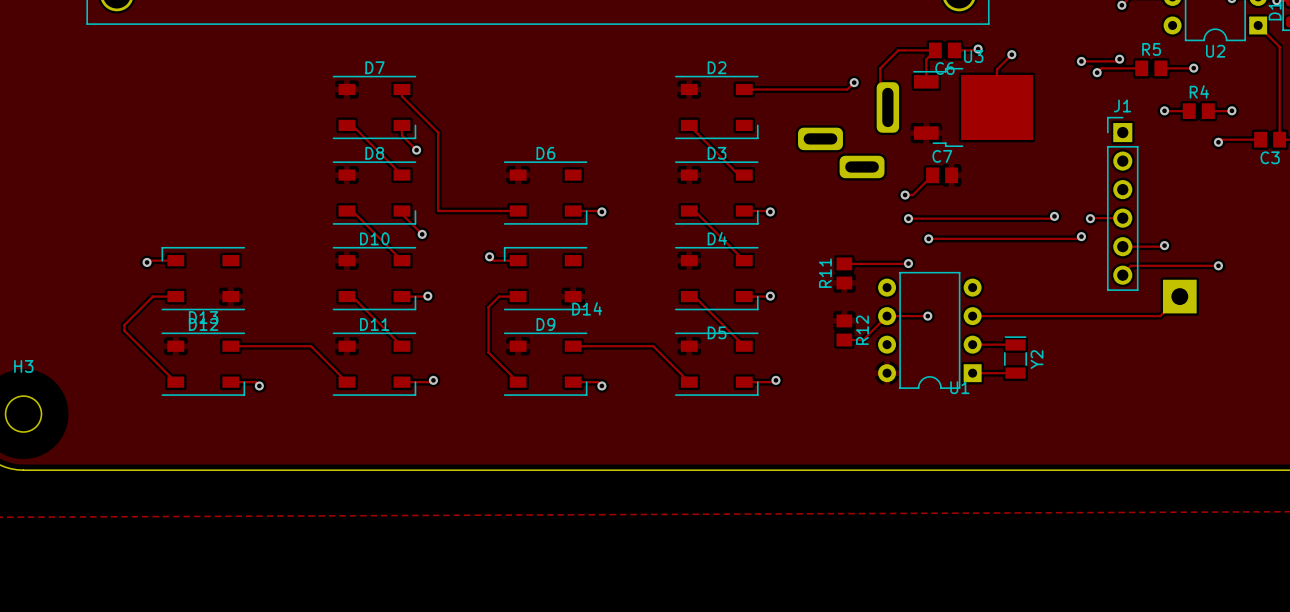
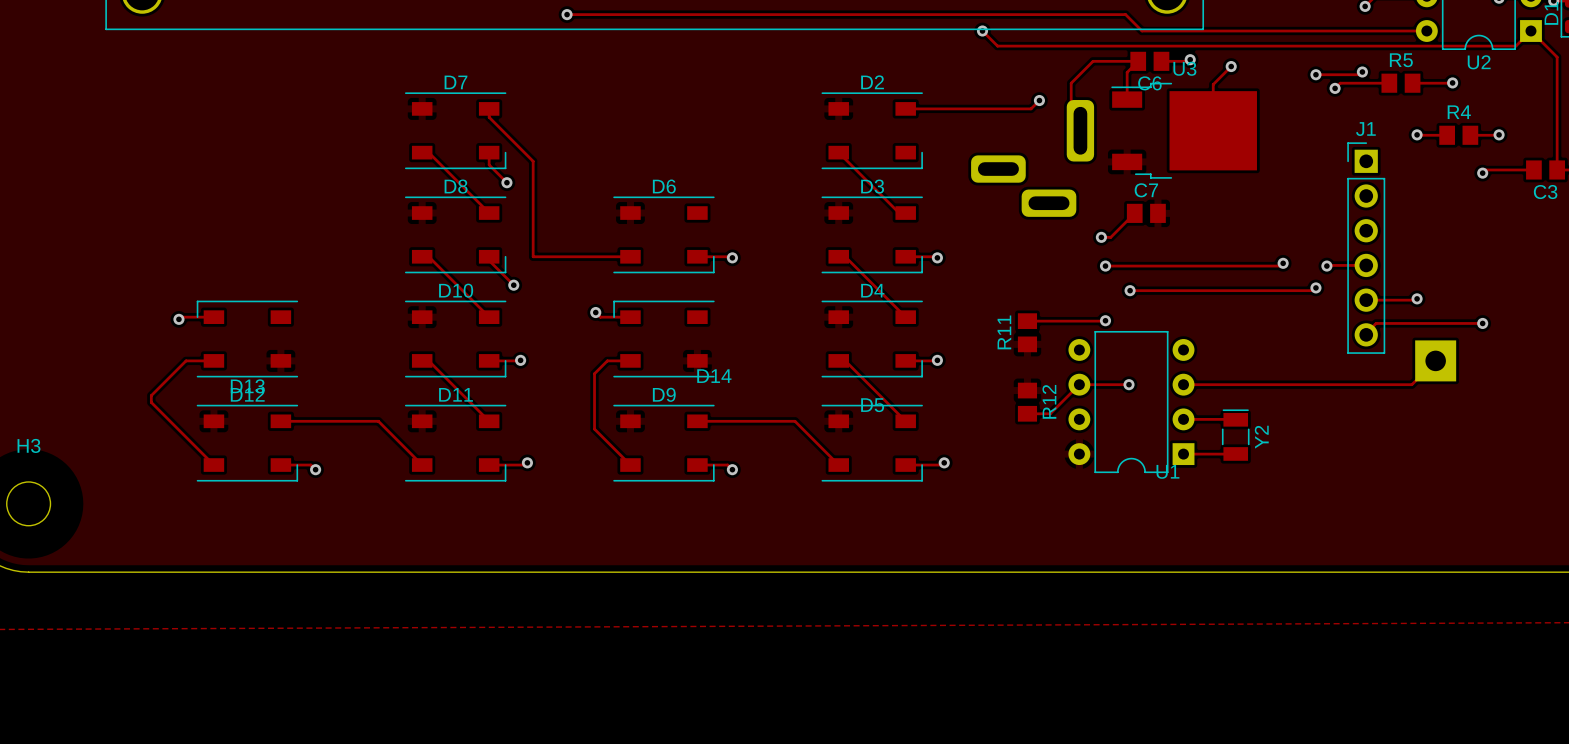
track: none -> (567, 14) (1125, 14) (1142, 31) (1426, 31)
via: none -> (567, 14)
track: none -> (982, 31) (997, 46) (1515, 46) (1530, 31)
via: none -> (982, 31)

